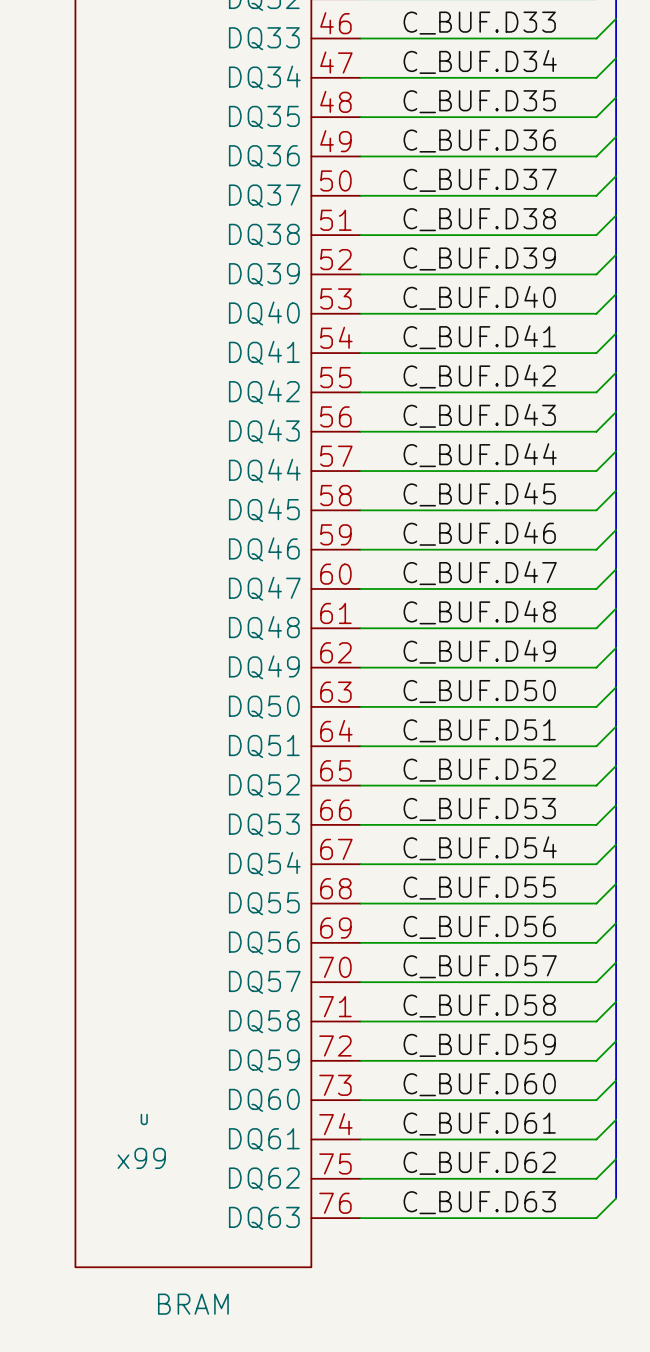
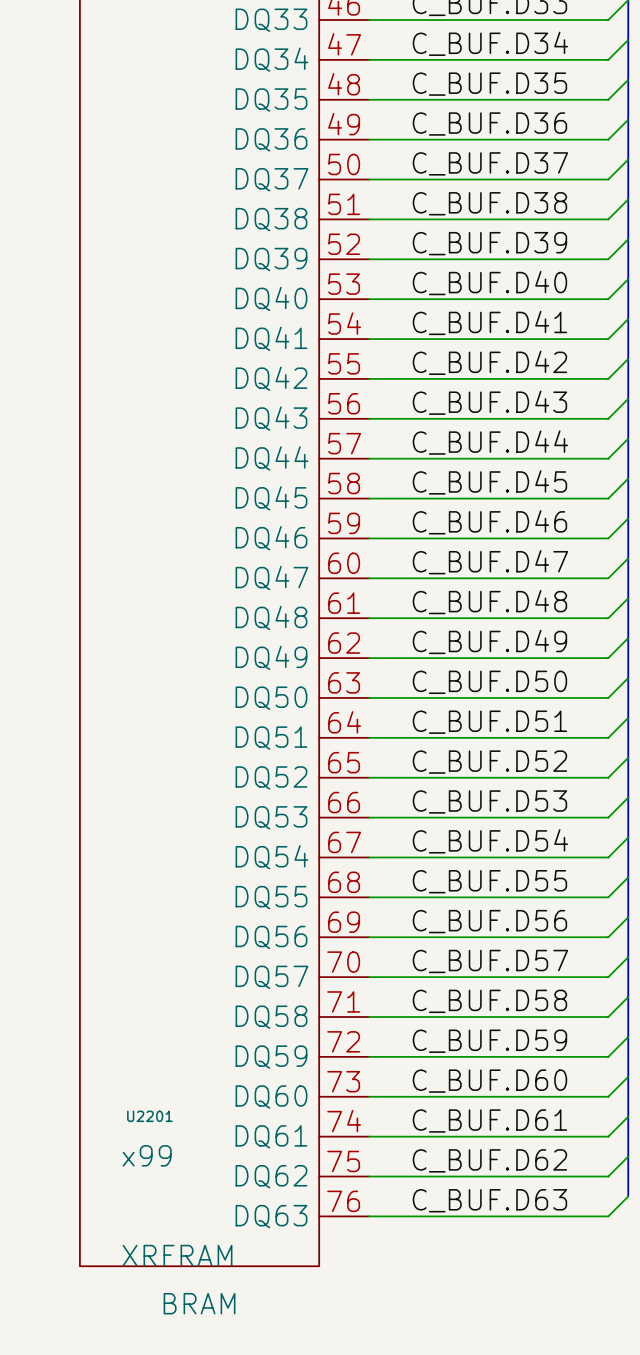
U name: U (144, 1119) -> U2201 (149, 1116)
U value: none -> XRFRAM (177, 1255)

